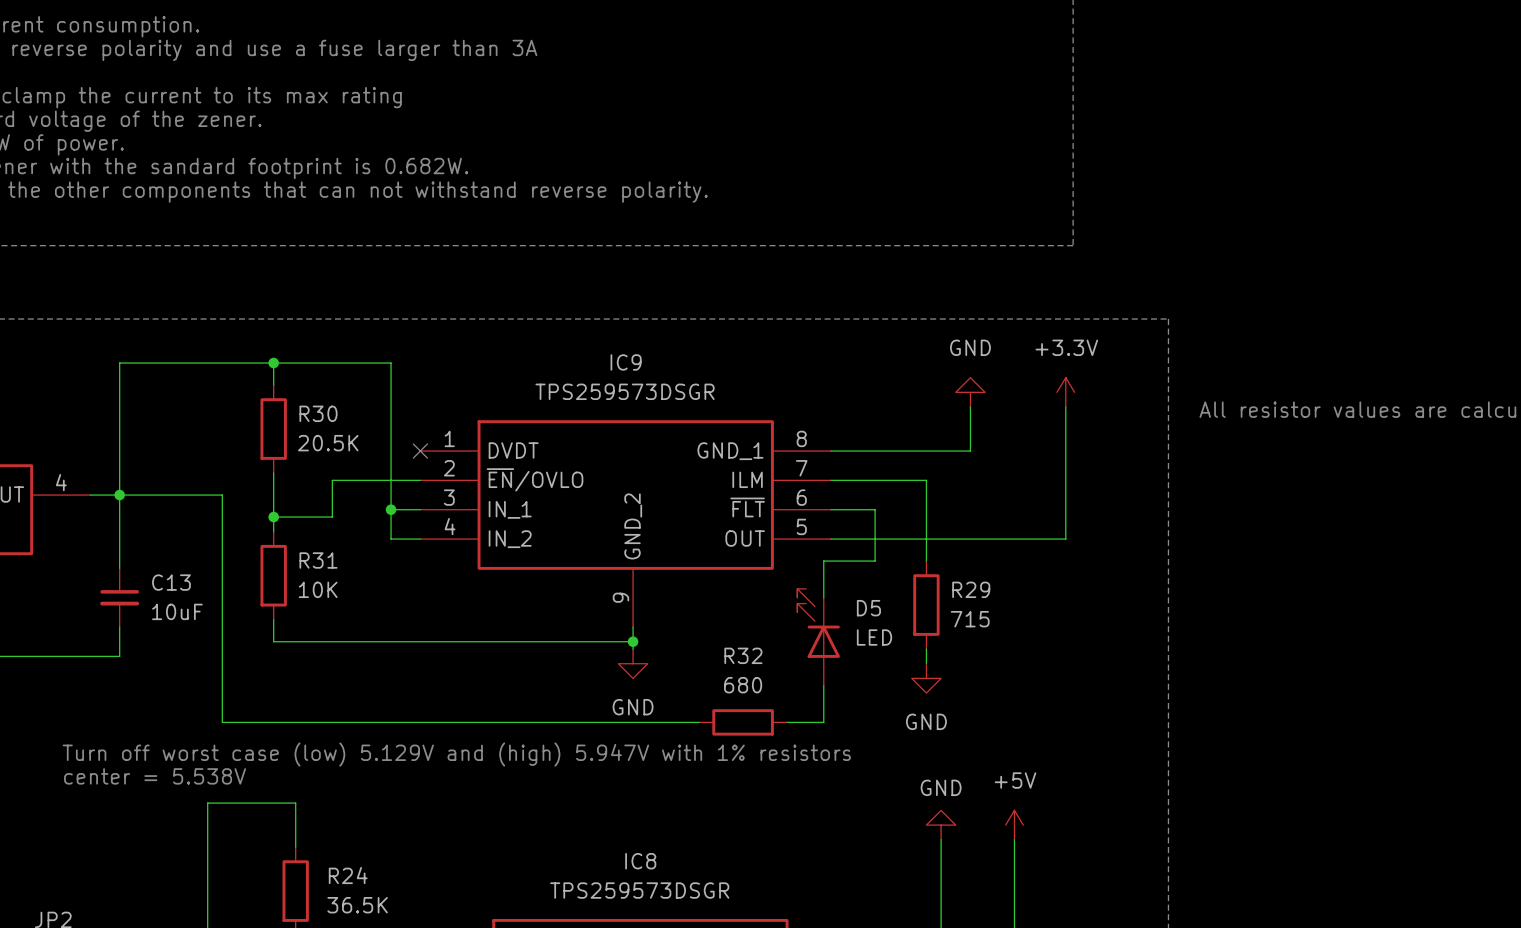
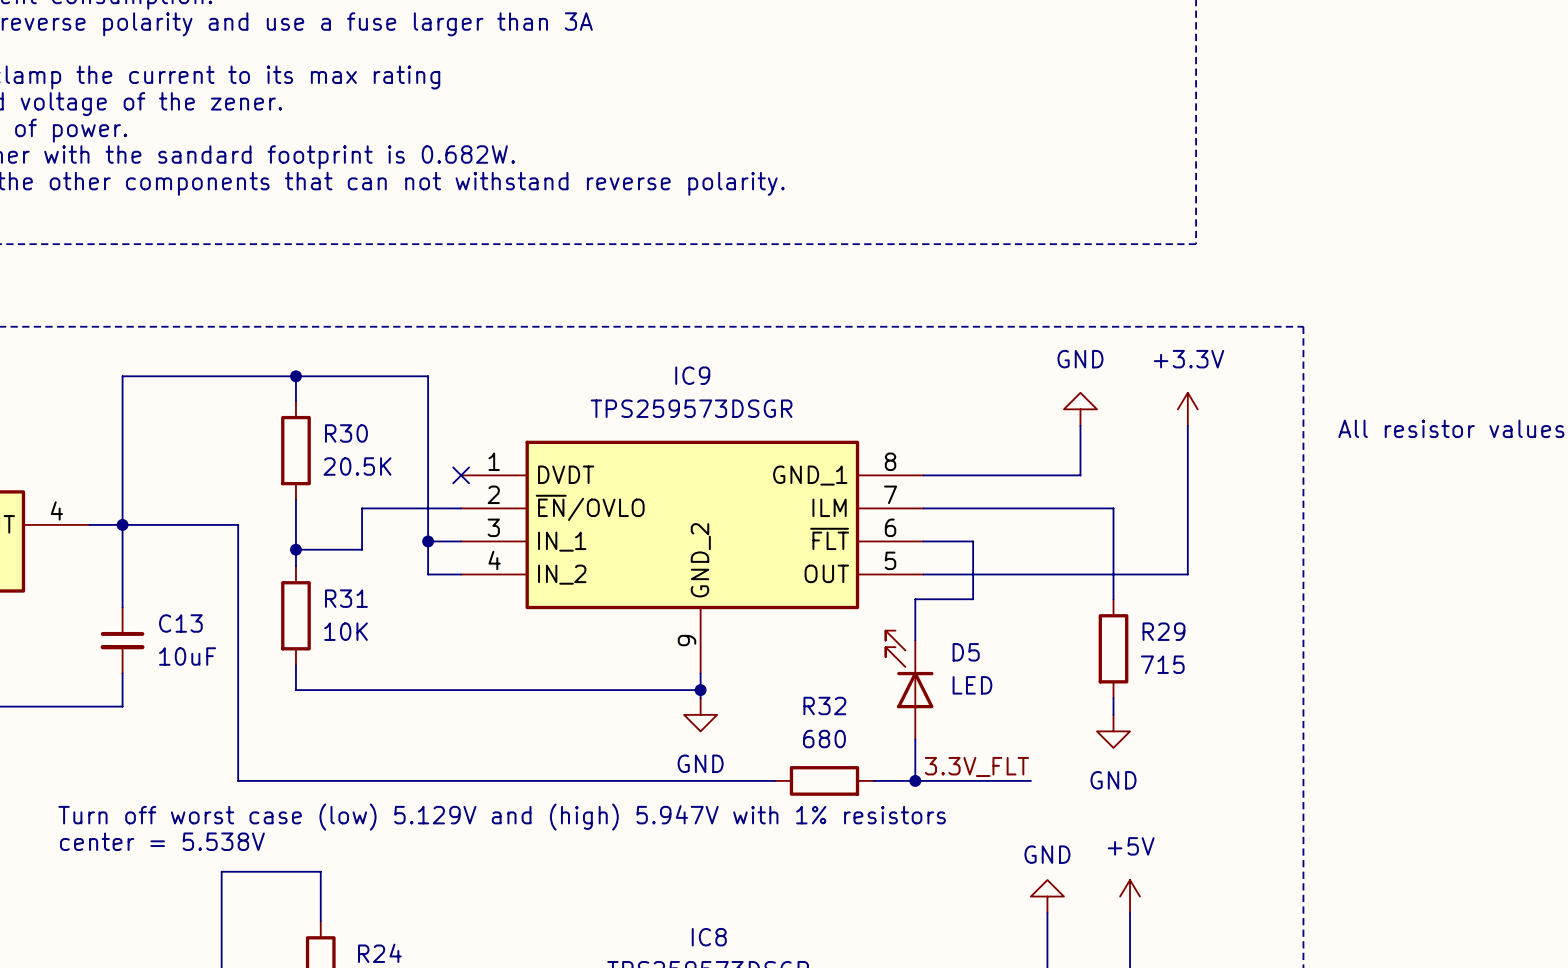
wire: (926, 480) (926, 561) -> (1030, 508) (1113, 508) (1113, 599)
R29 position: (926, 605) -> (1113, 648)
wire: (926, 649) (926, 663) -> (1113, 698) (1113, 714)
power symbol position: GND (926, 678) -> GND (1113, 731)
label: none -> 3.3V_FLT (976, 766)
wire: none -> (915, 780) (1030, 780)
junction: none -> (915, 780)

